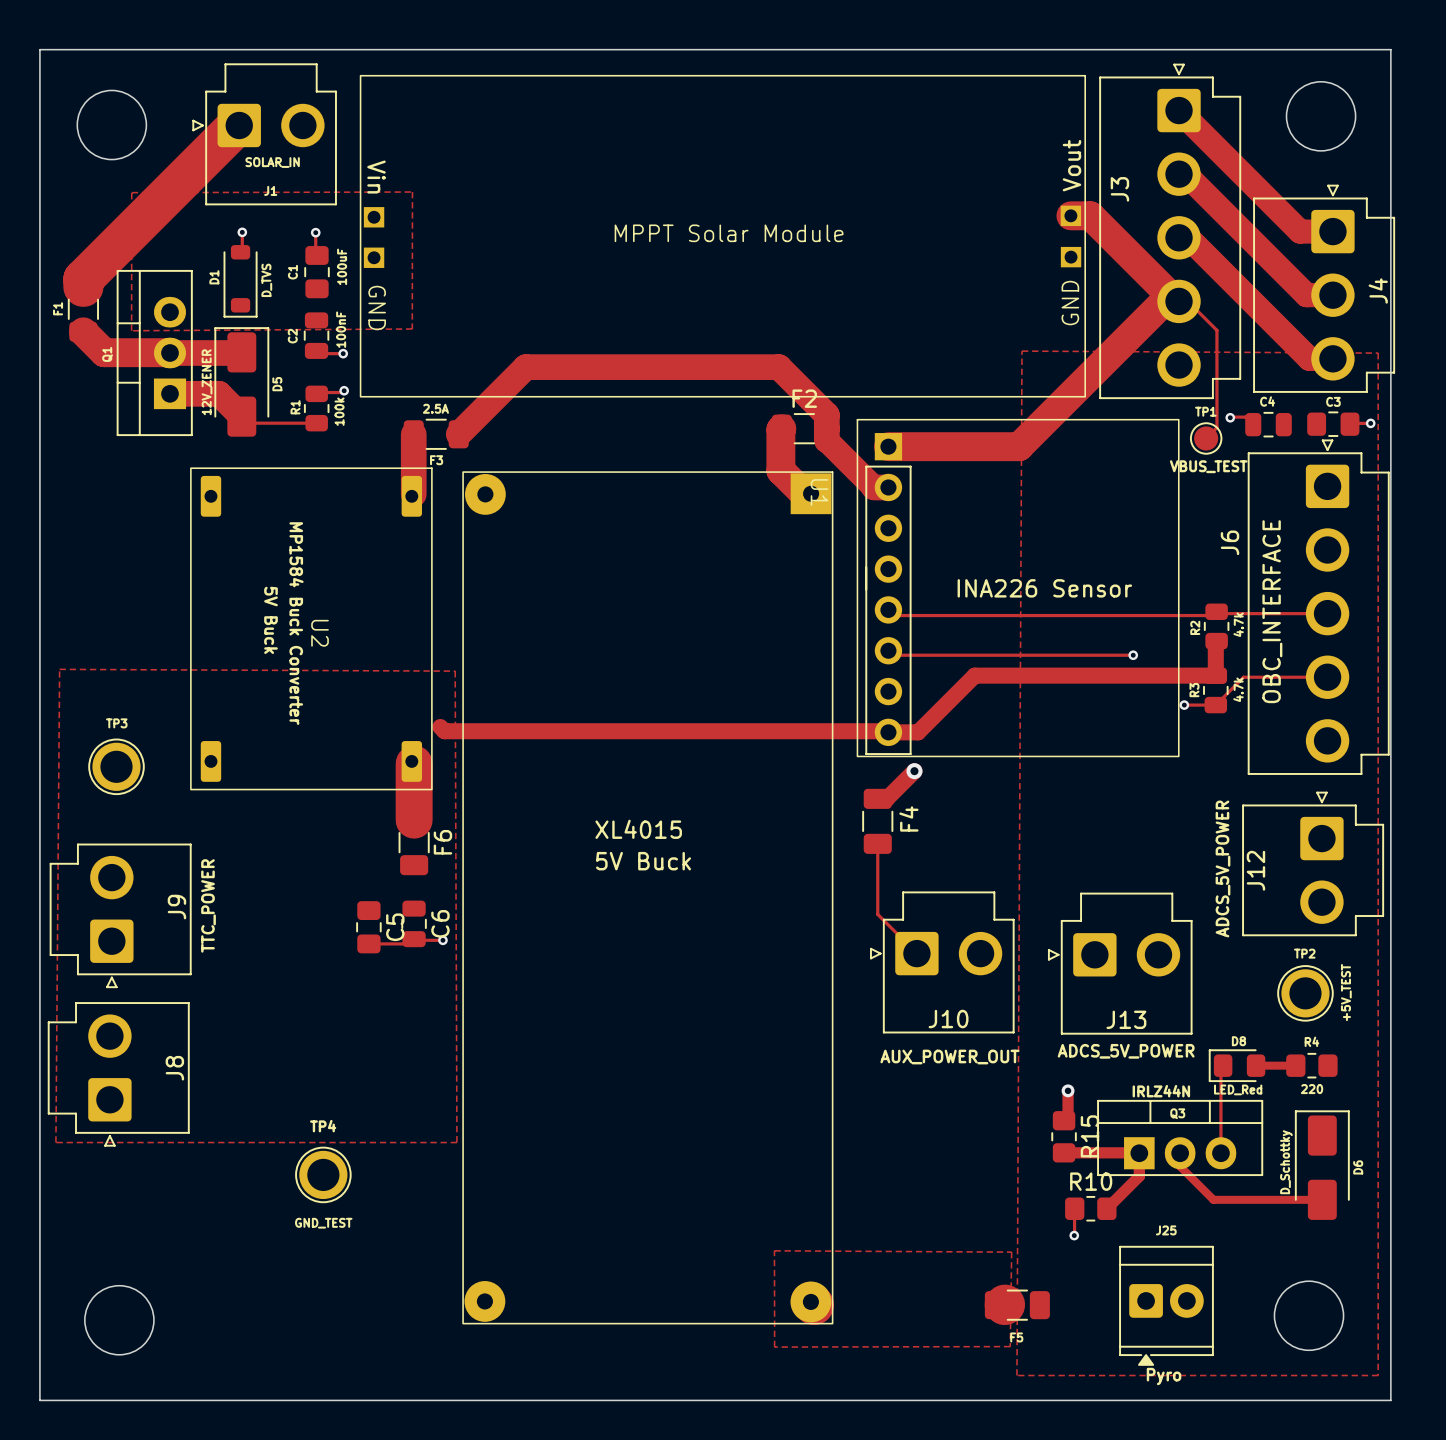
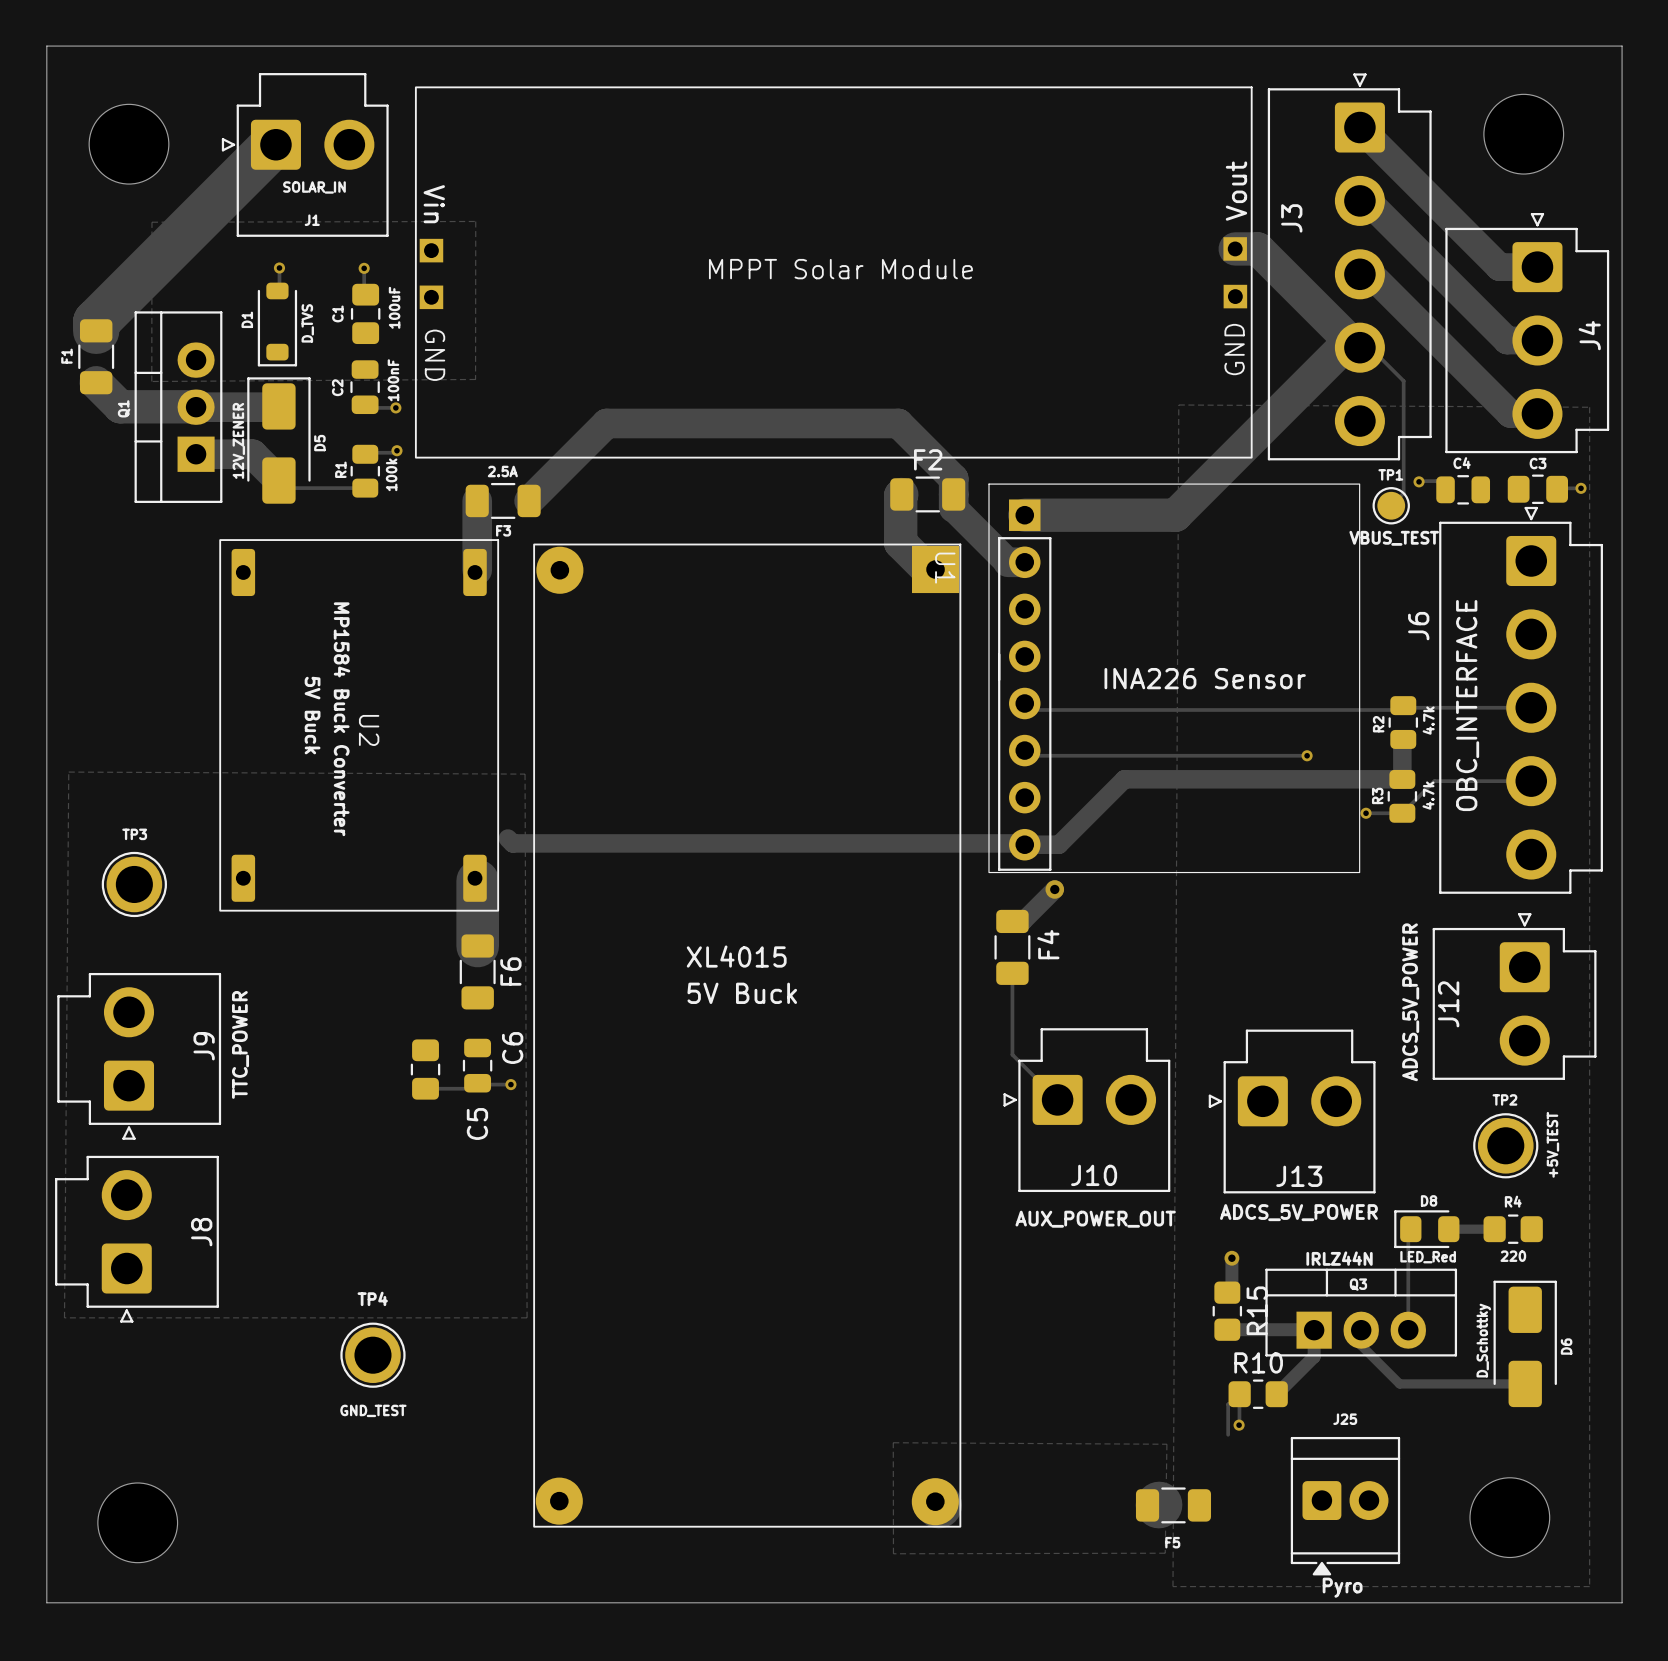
board edge: (39, 49) (1390, 49) (1390, 1400) (39, 1400) (39, 49) -> (46, 46) (46, 1602) (1622, 1602) (1622, 46) (46, 46)
C6 name position: C6 (440, 923) -> C6 (512, 1048)
C5 name position: C5 (395, 927) -> C5 (477, 1124)
track: none -> (1228, 1403) (1228, 1434)

